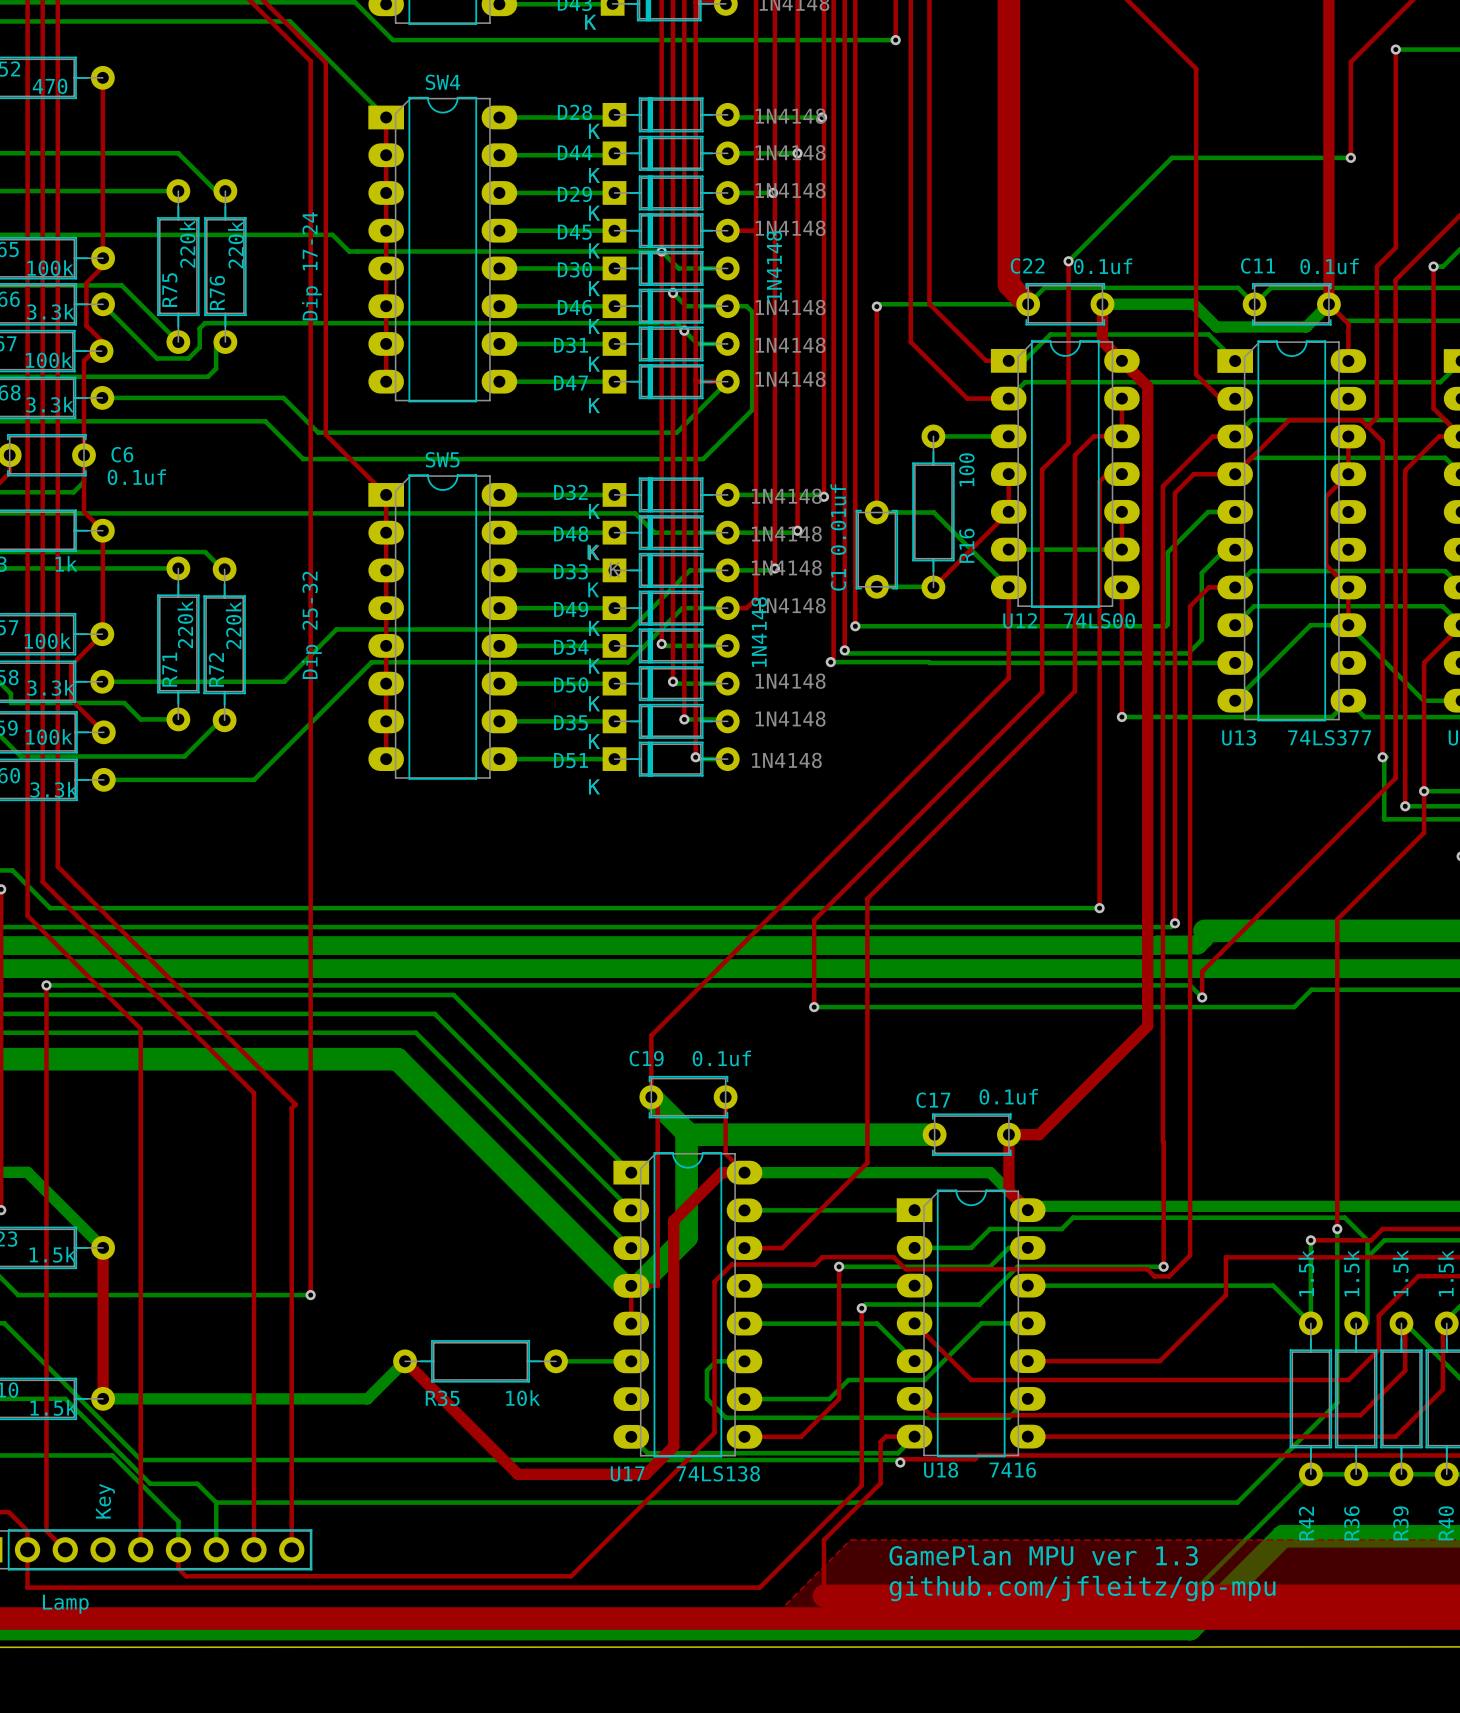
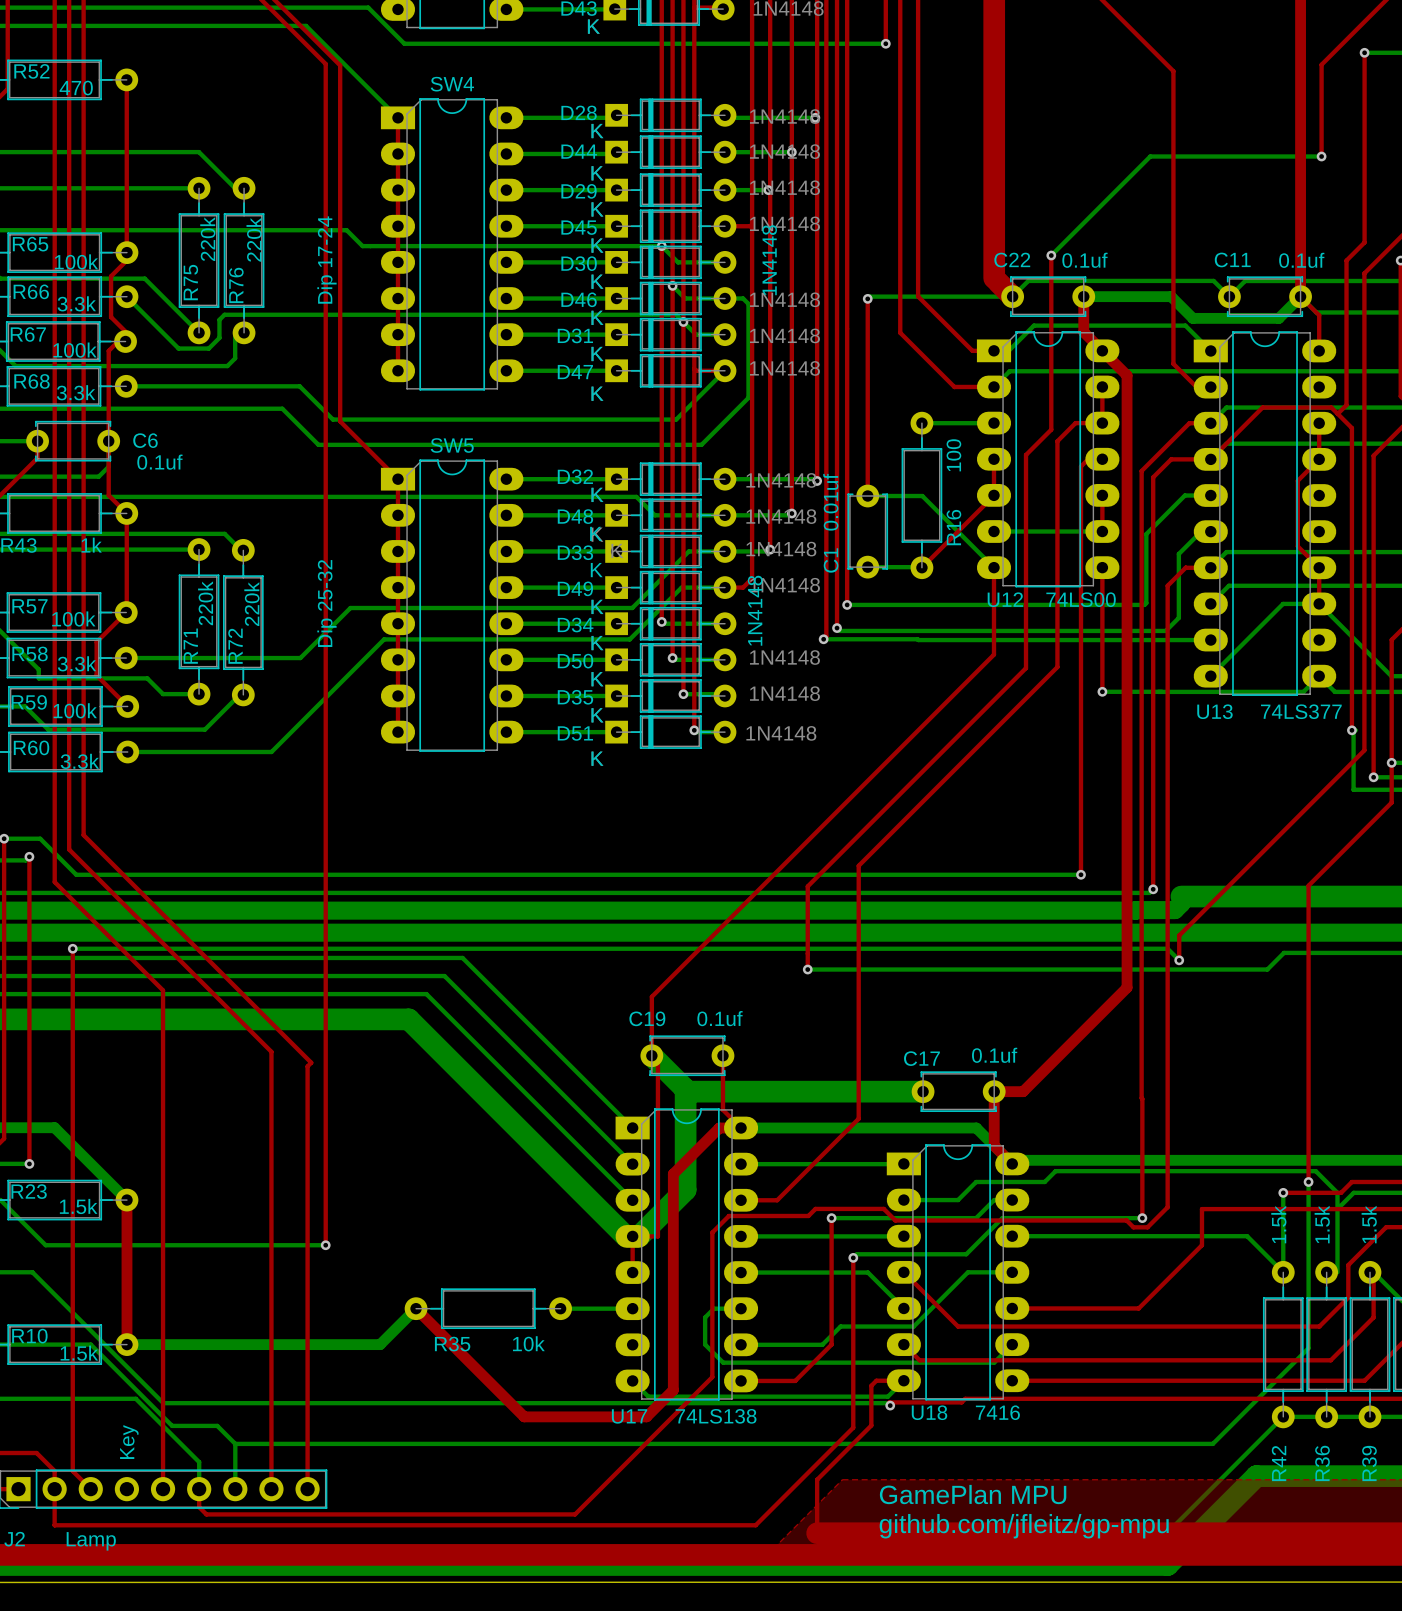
text: GamePlan MPU ver 1.3 (1043, 1555) -> GamePlan MPU (973, 1494)

